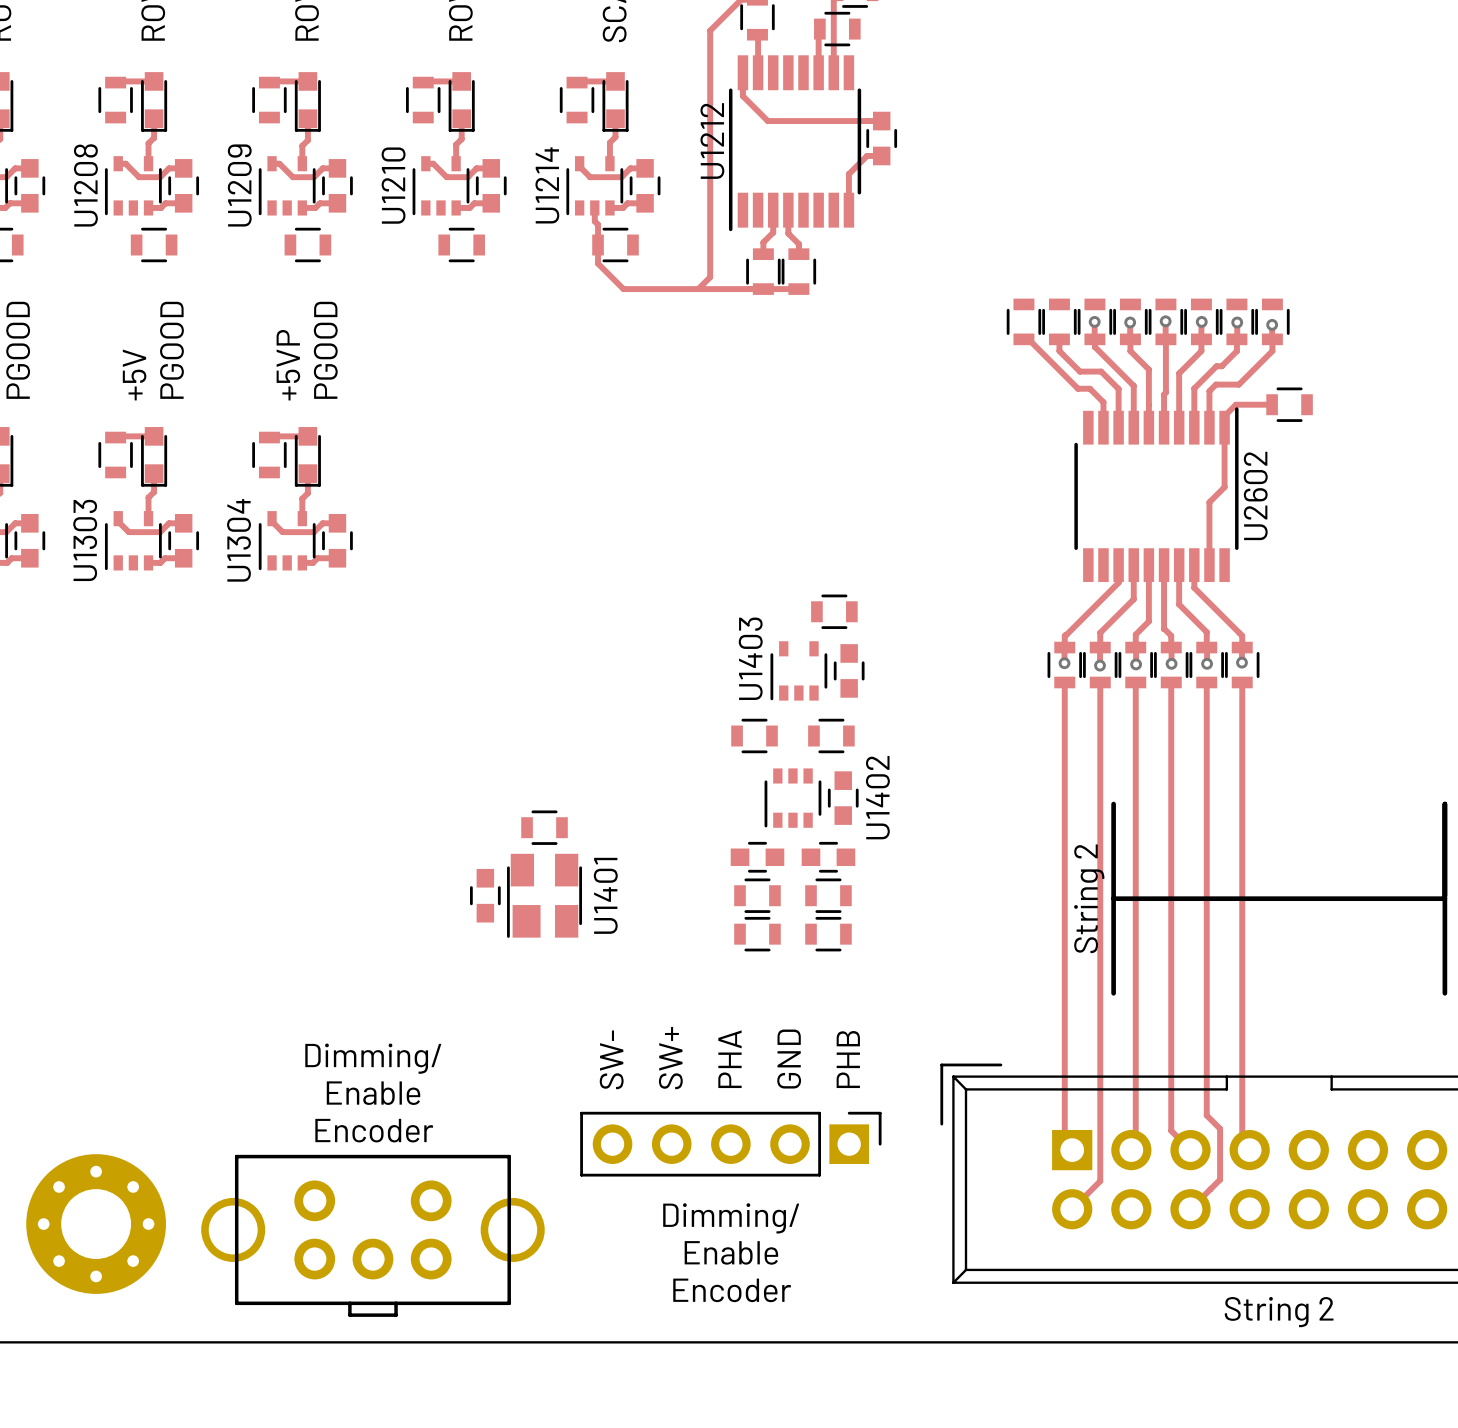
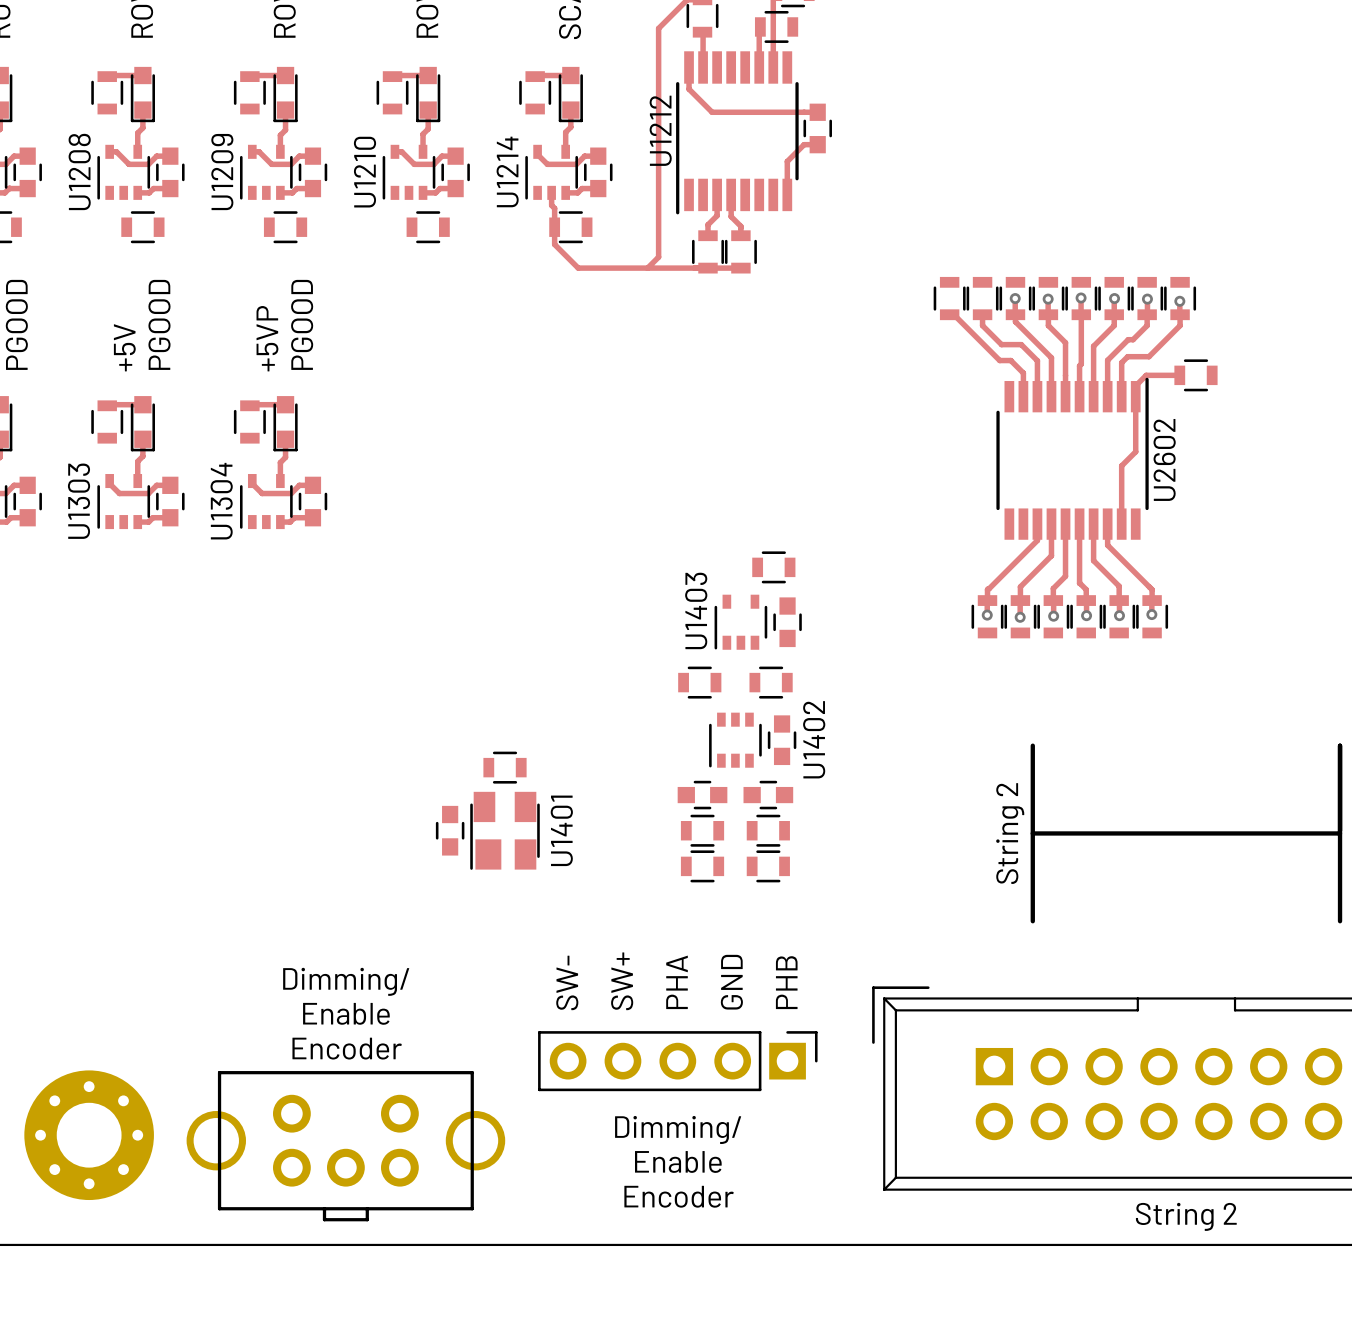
track: (1064, 682) (1064, 1142) (1072, 1150) -> none
track: (1100, 682) (1100, 1181) (1072, 1209) -> none
track: (1135, 682) (1135, 1145) (1131, 1150) -> none
track: (1171, 682) (1171, 1130) (1190, 1150) -> none
track: (1206, 682) (1206, 1115) (1220, 1128) (1220, 1179) (1190, 1209) -> none
track: (1242, 682) (1242, 1142) (1249, 1150) -> none

